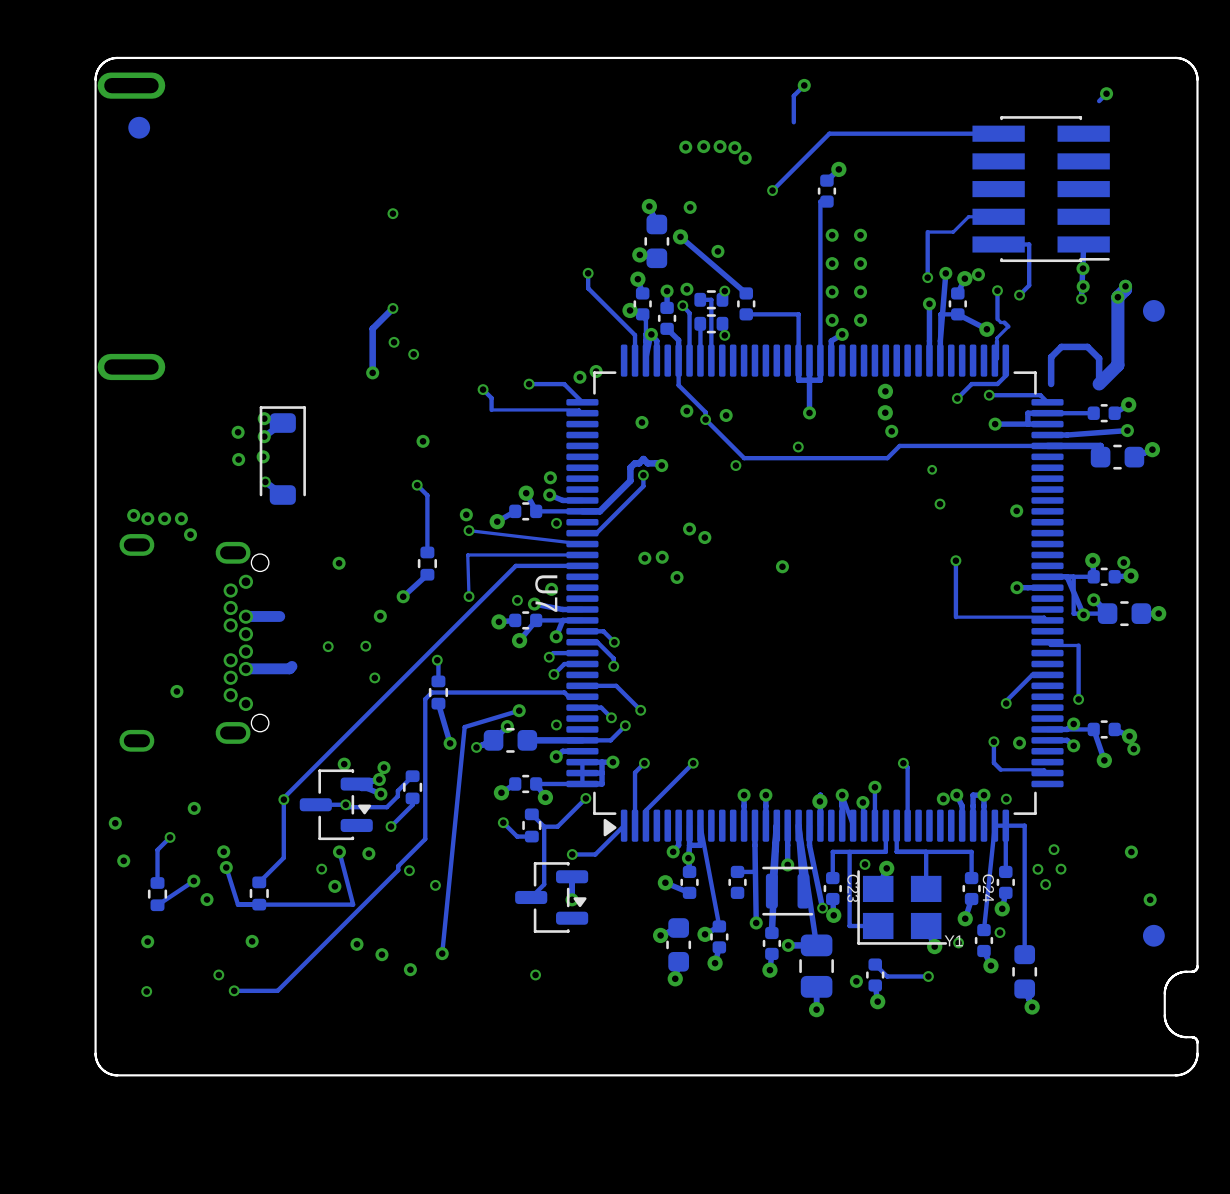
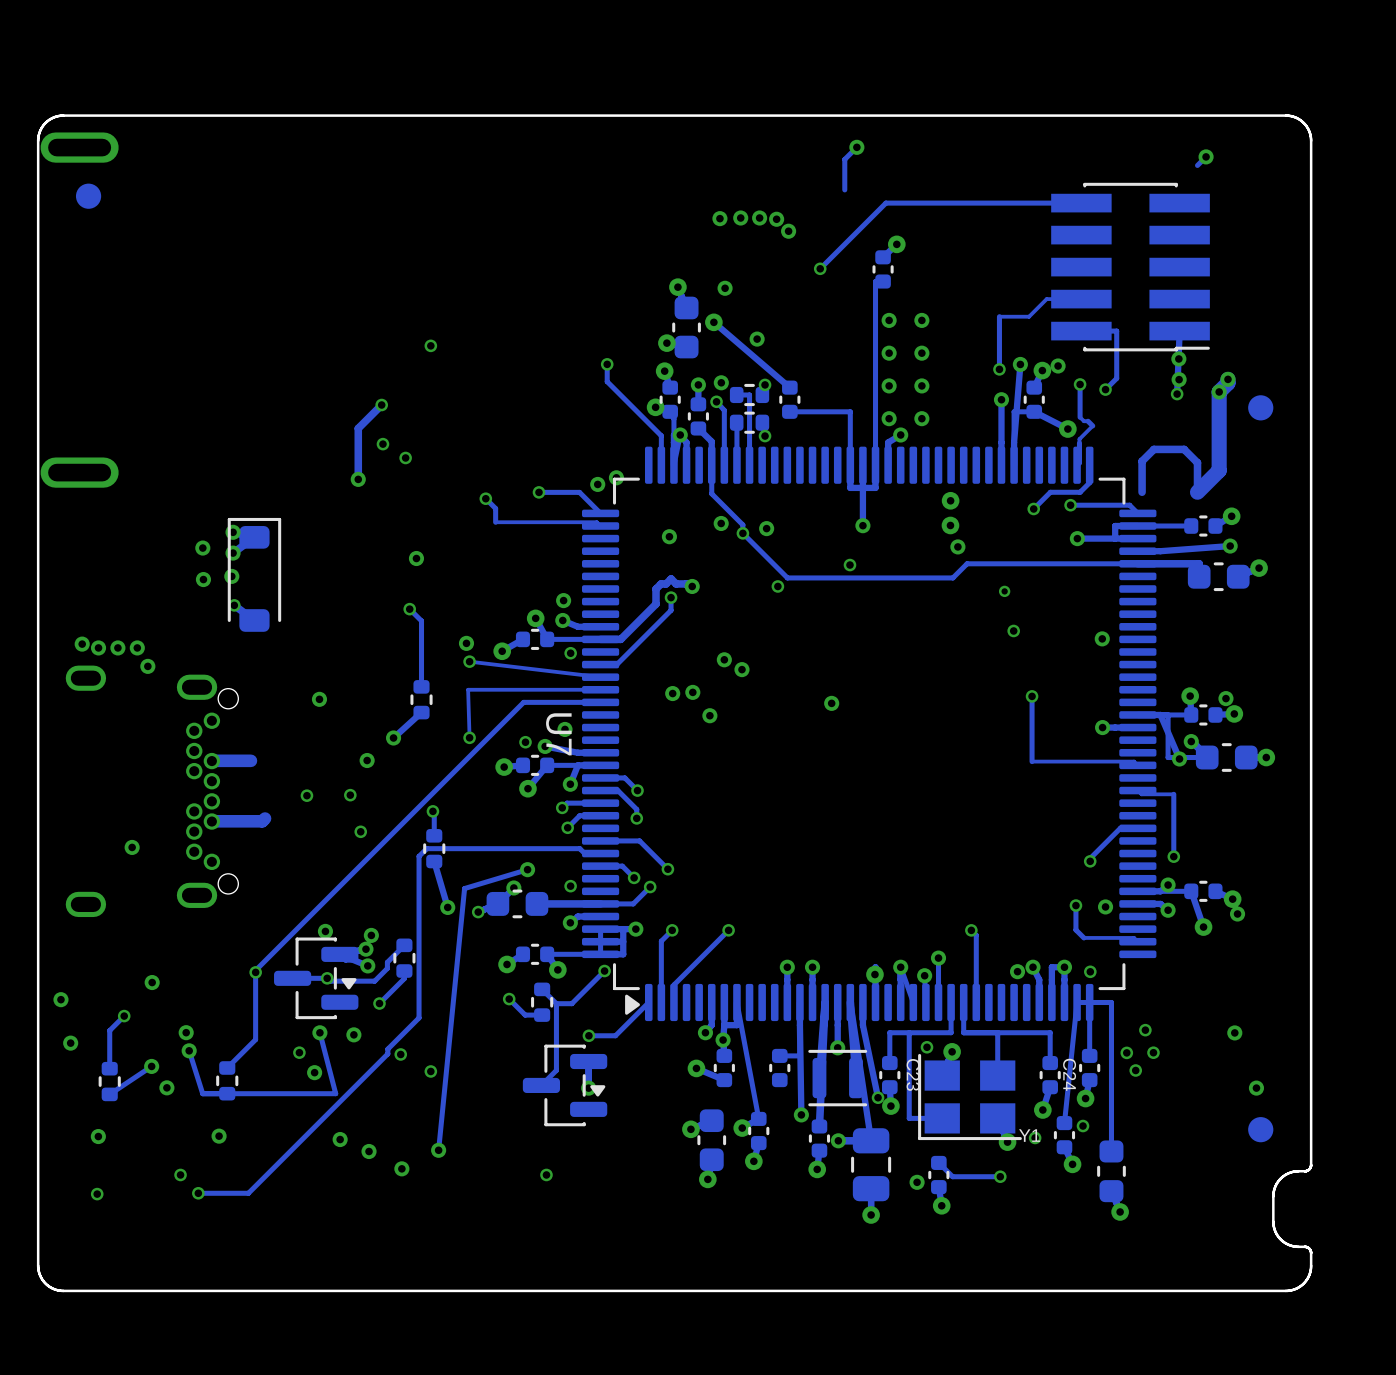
via position: (392, 213) -> (430, 345)

